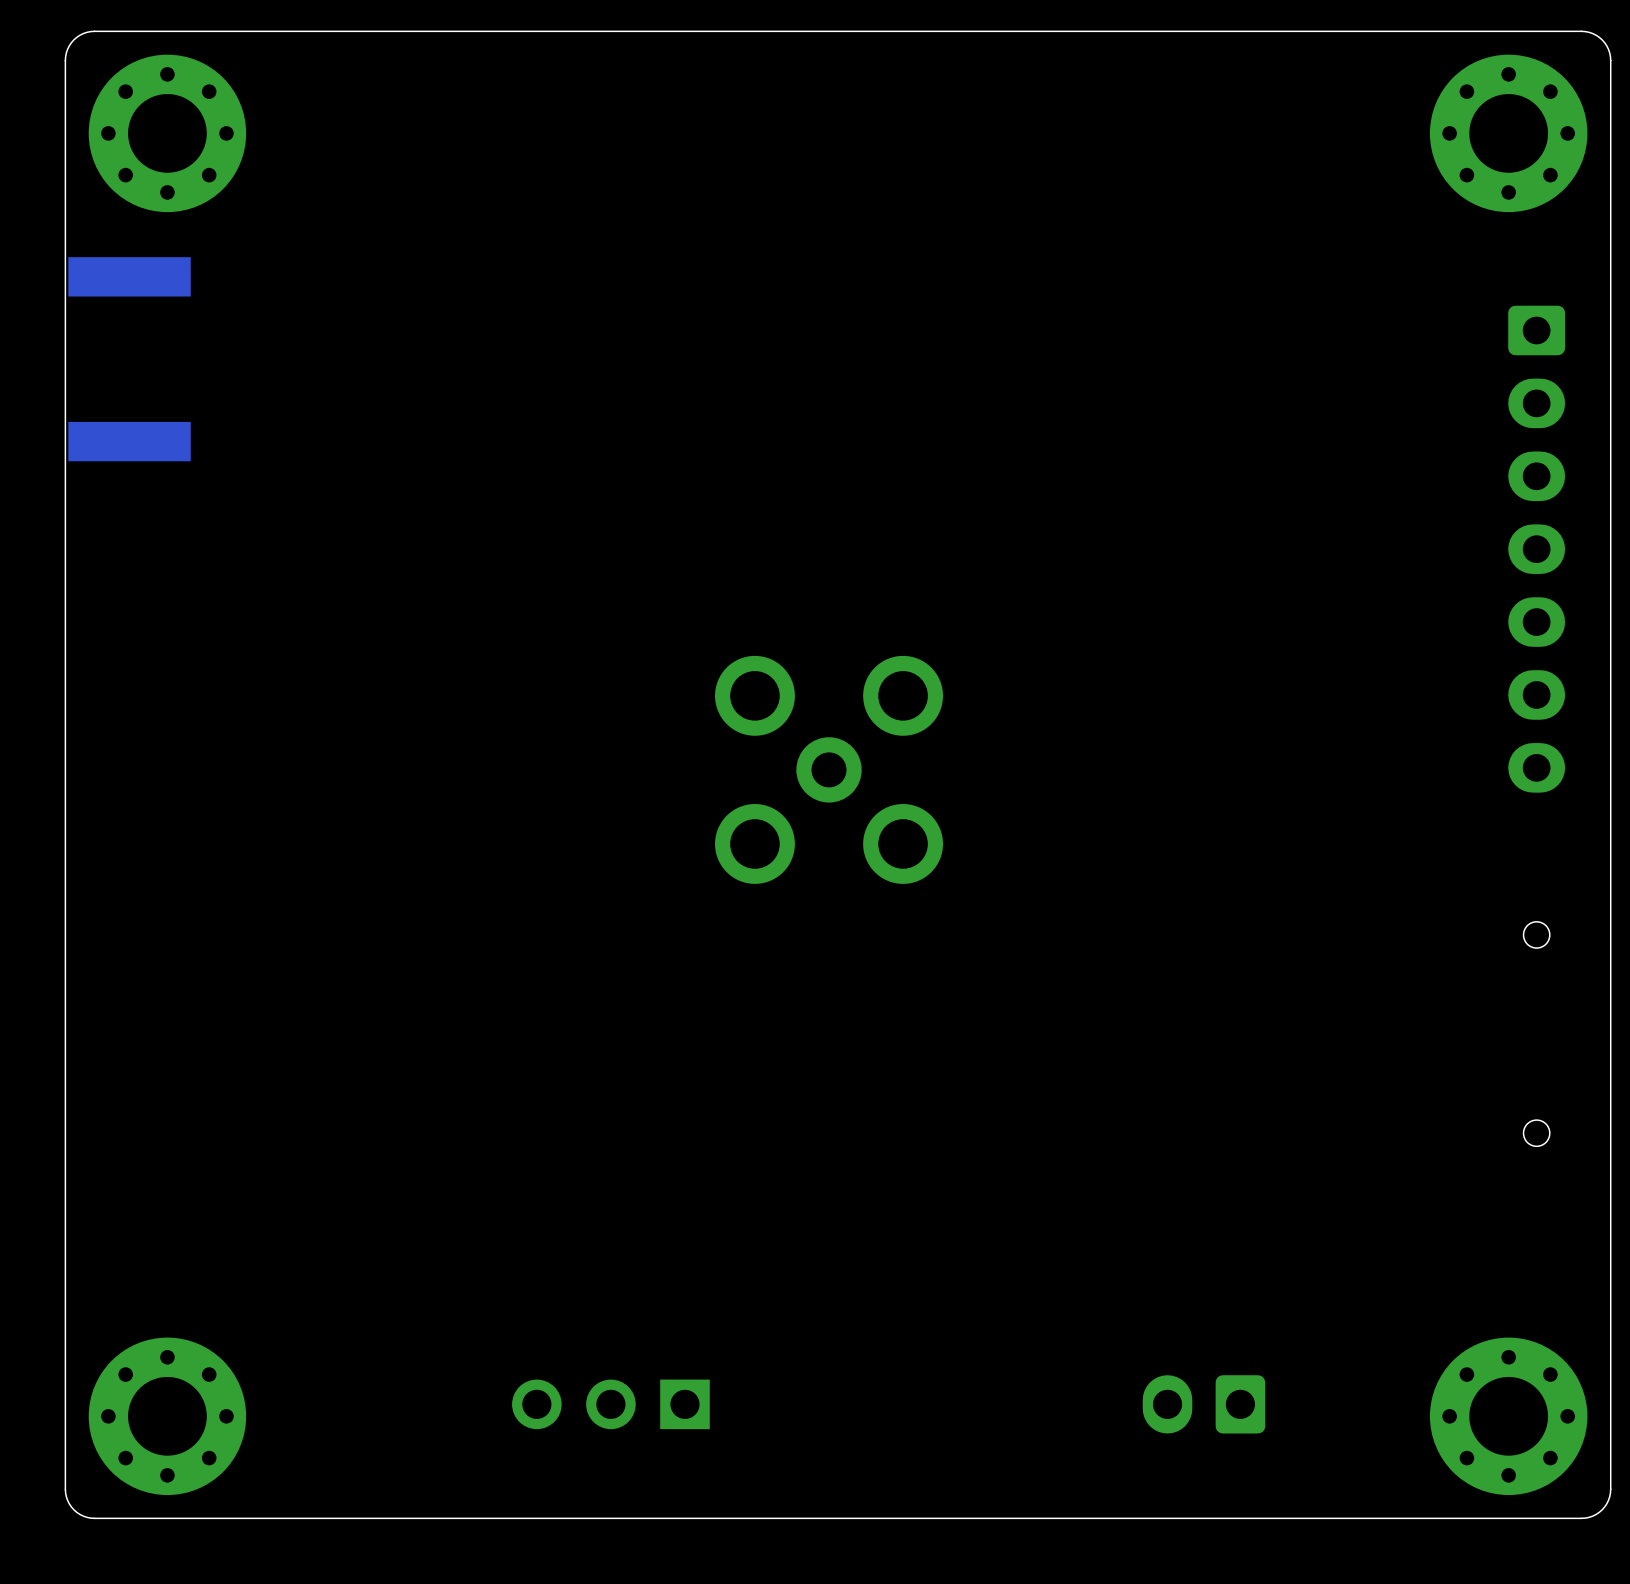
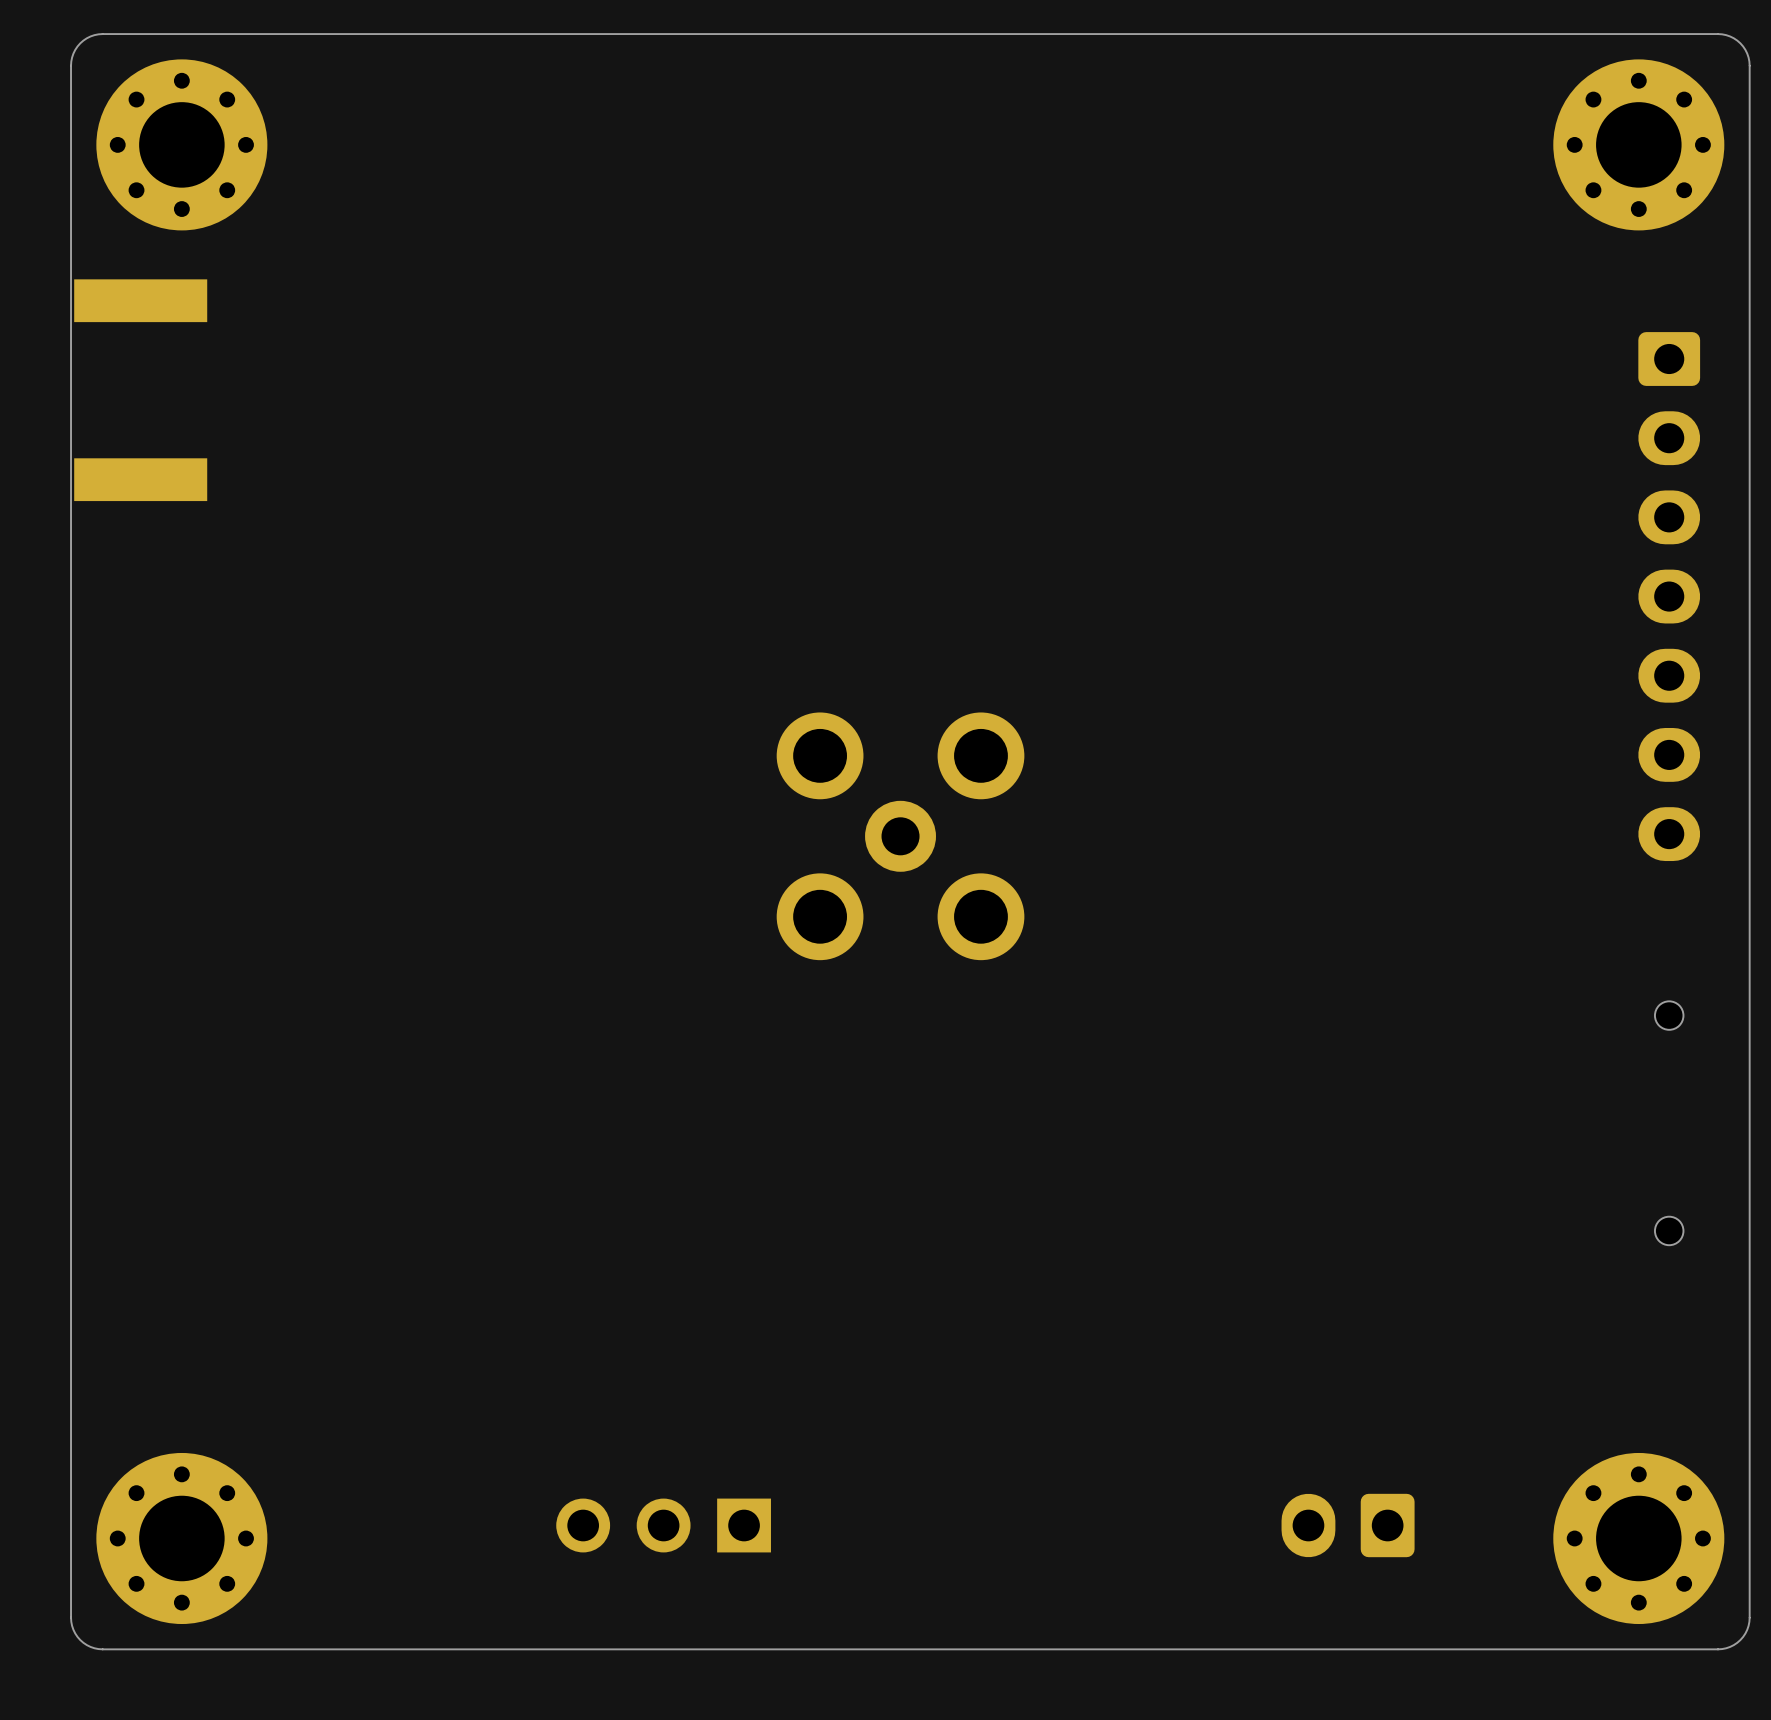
part position: (1203, 1404) -> (1348, 1525)

